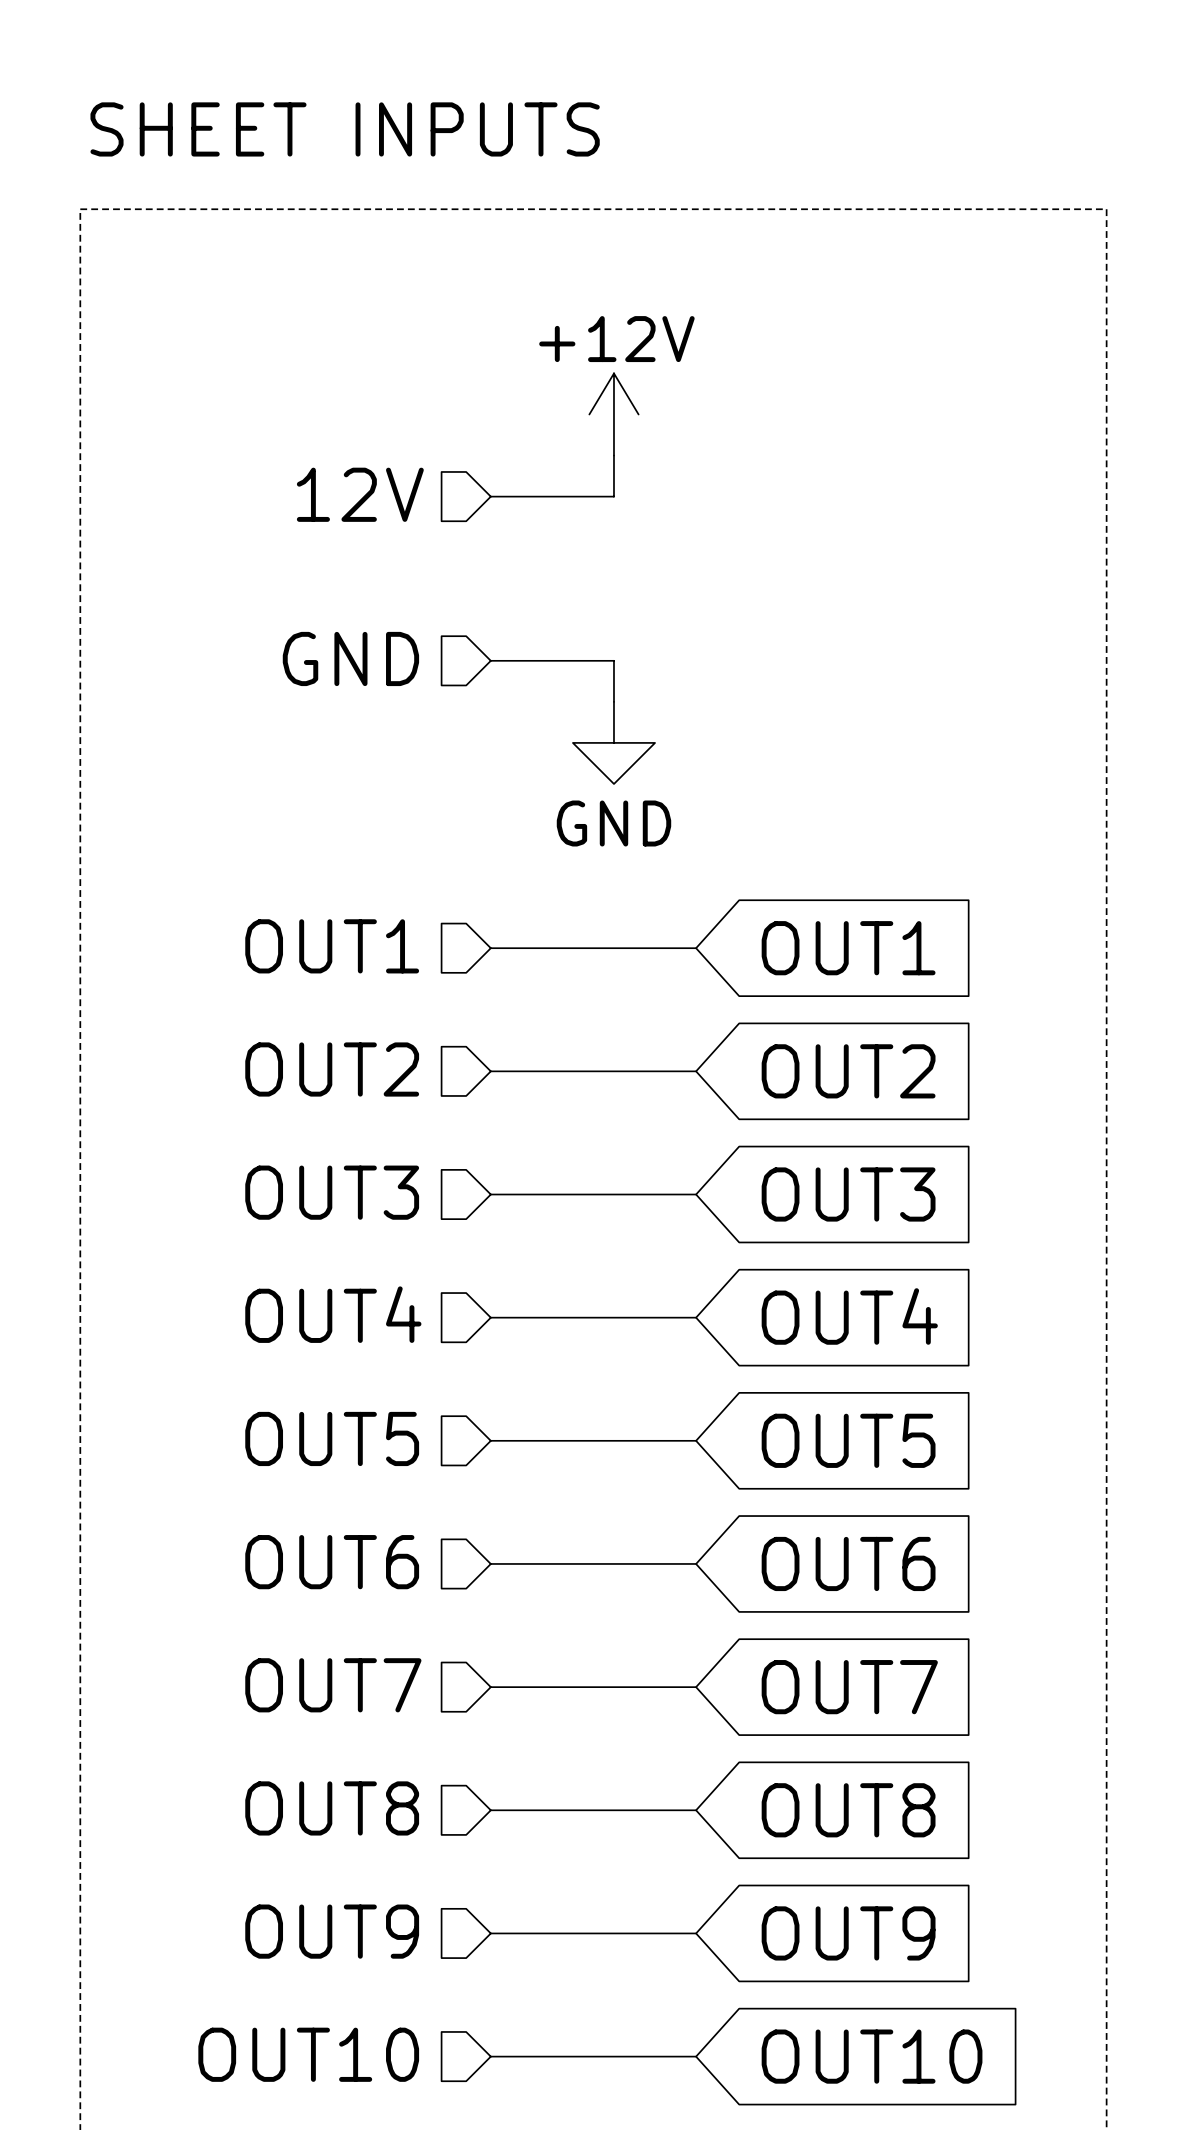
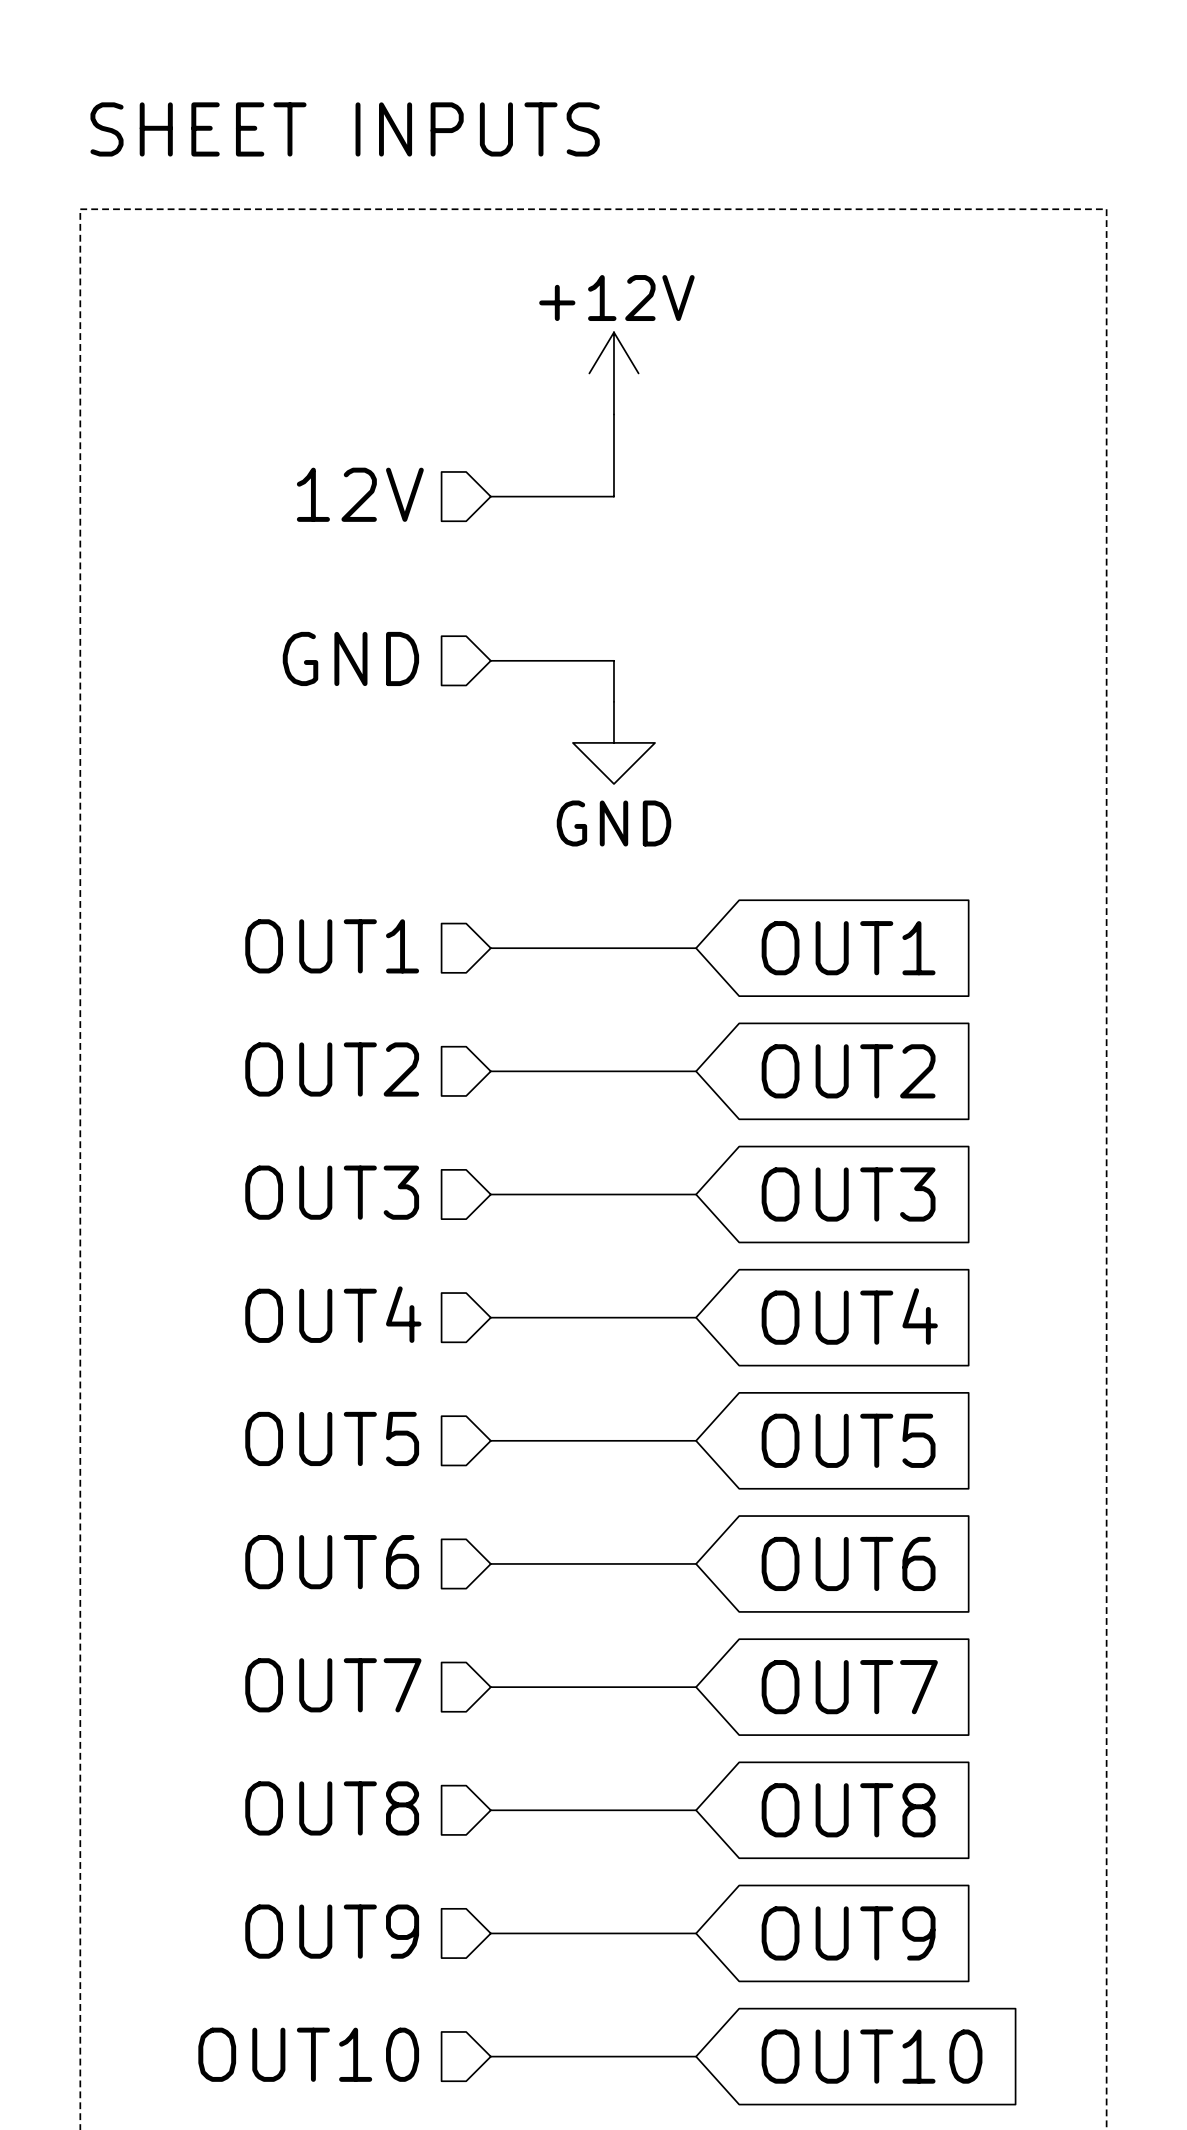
power symbol position: +12V (613, 414) -> +12V (613, 373)

